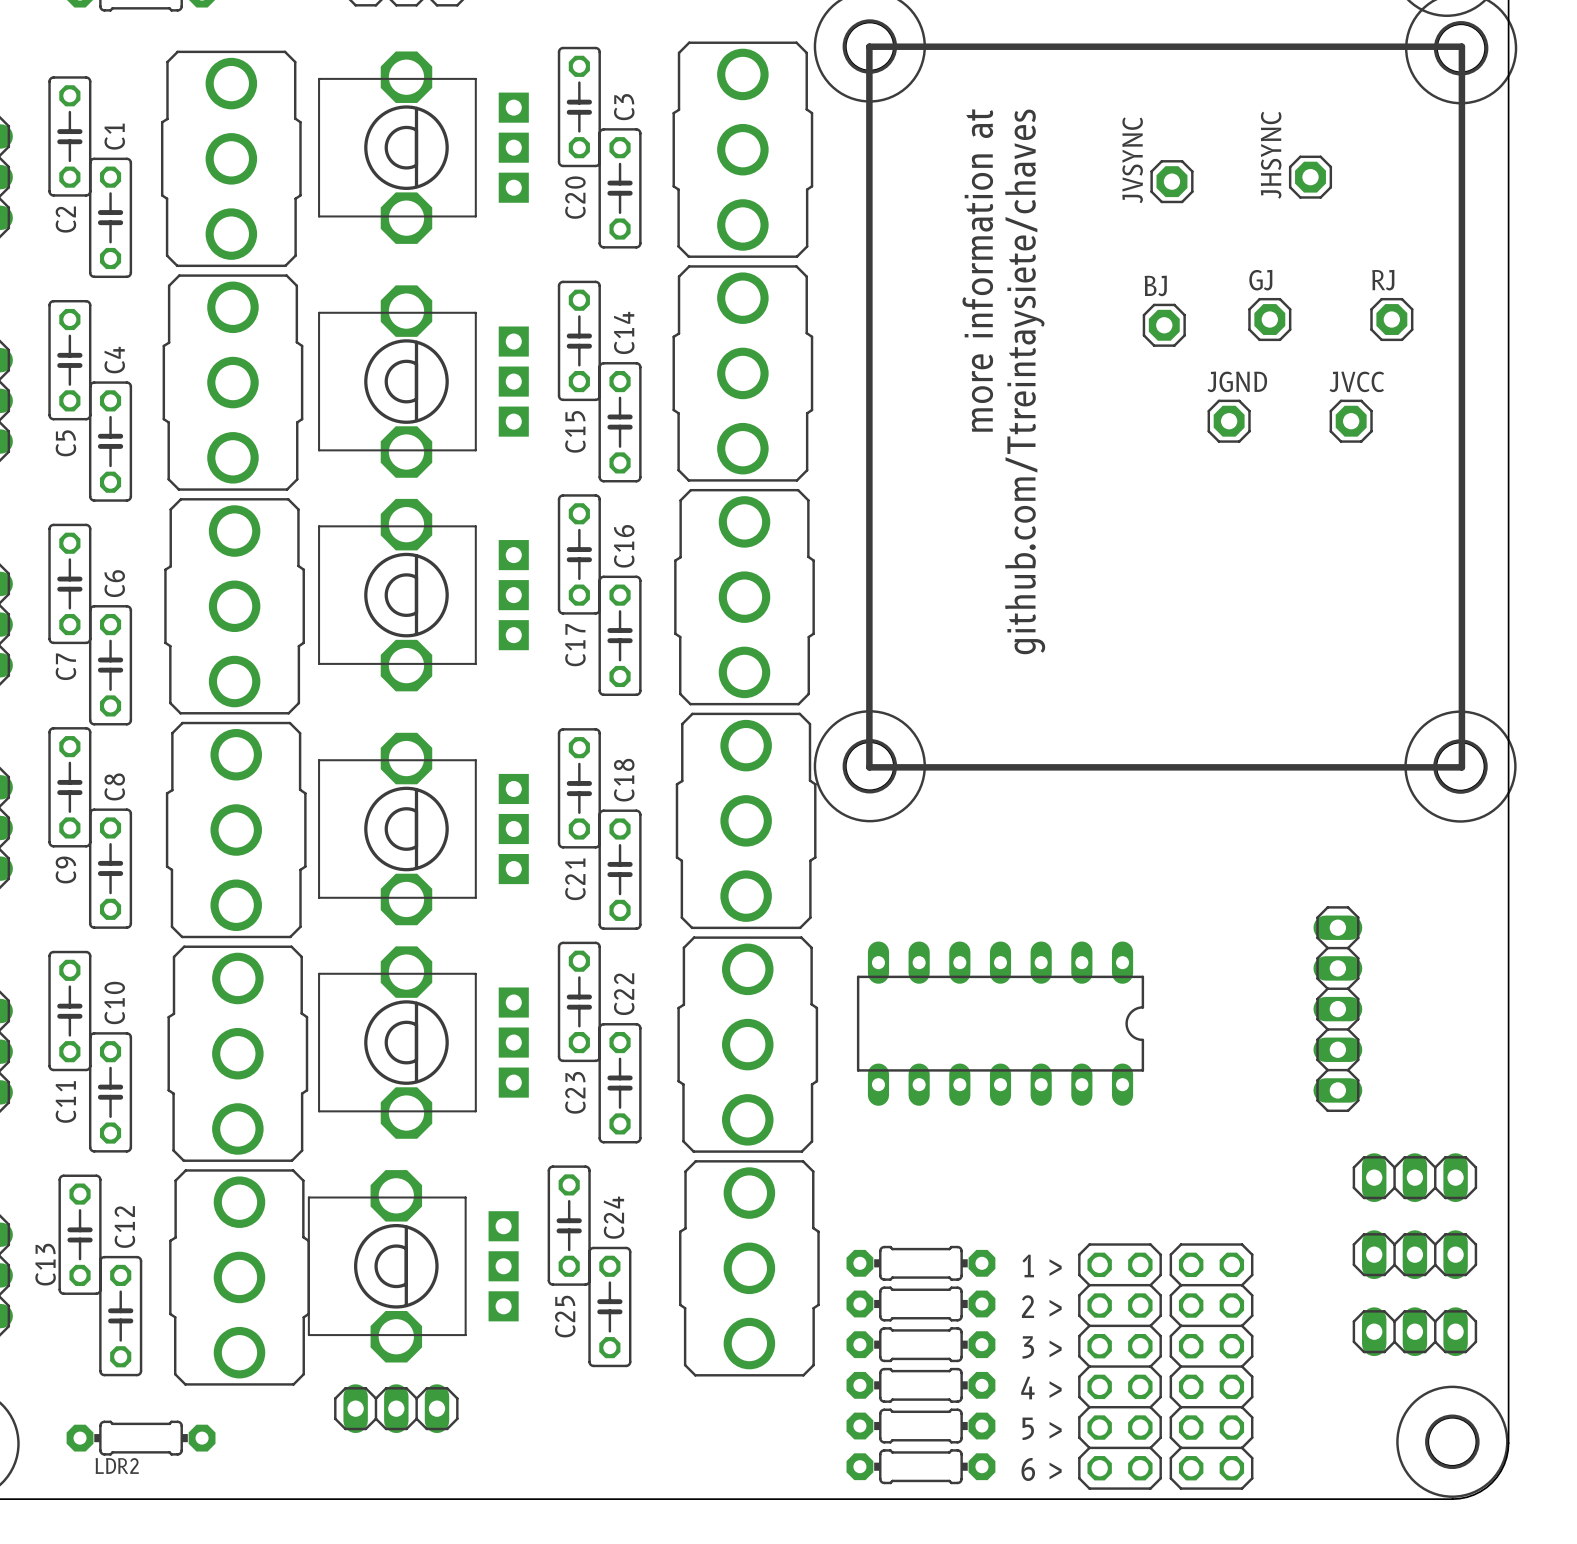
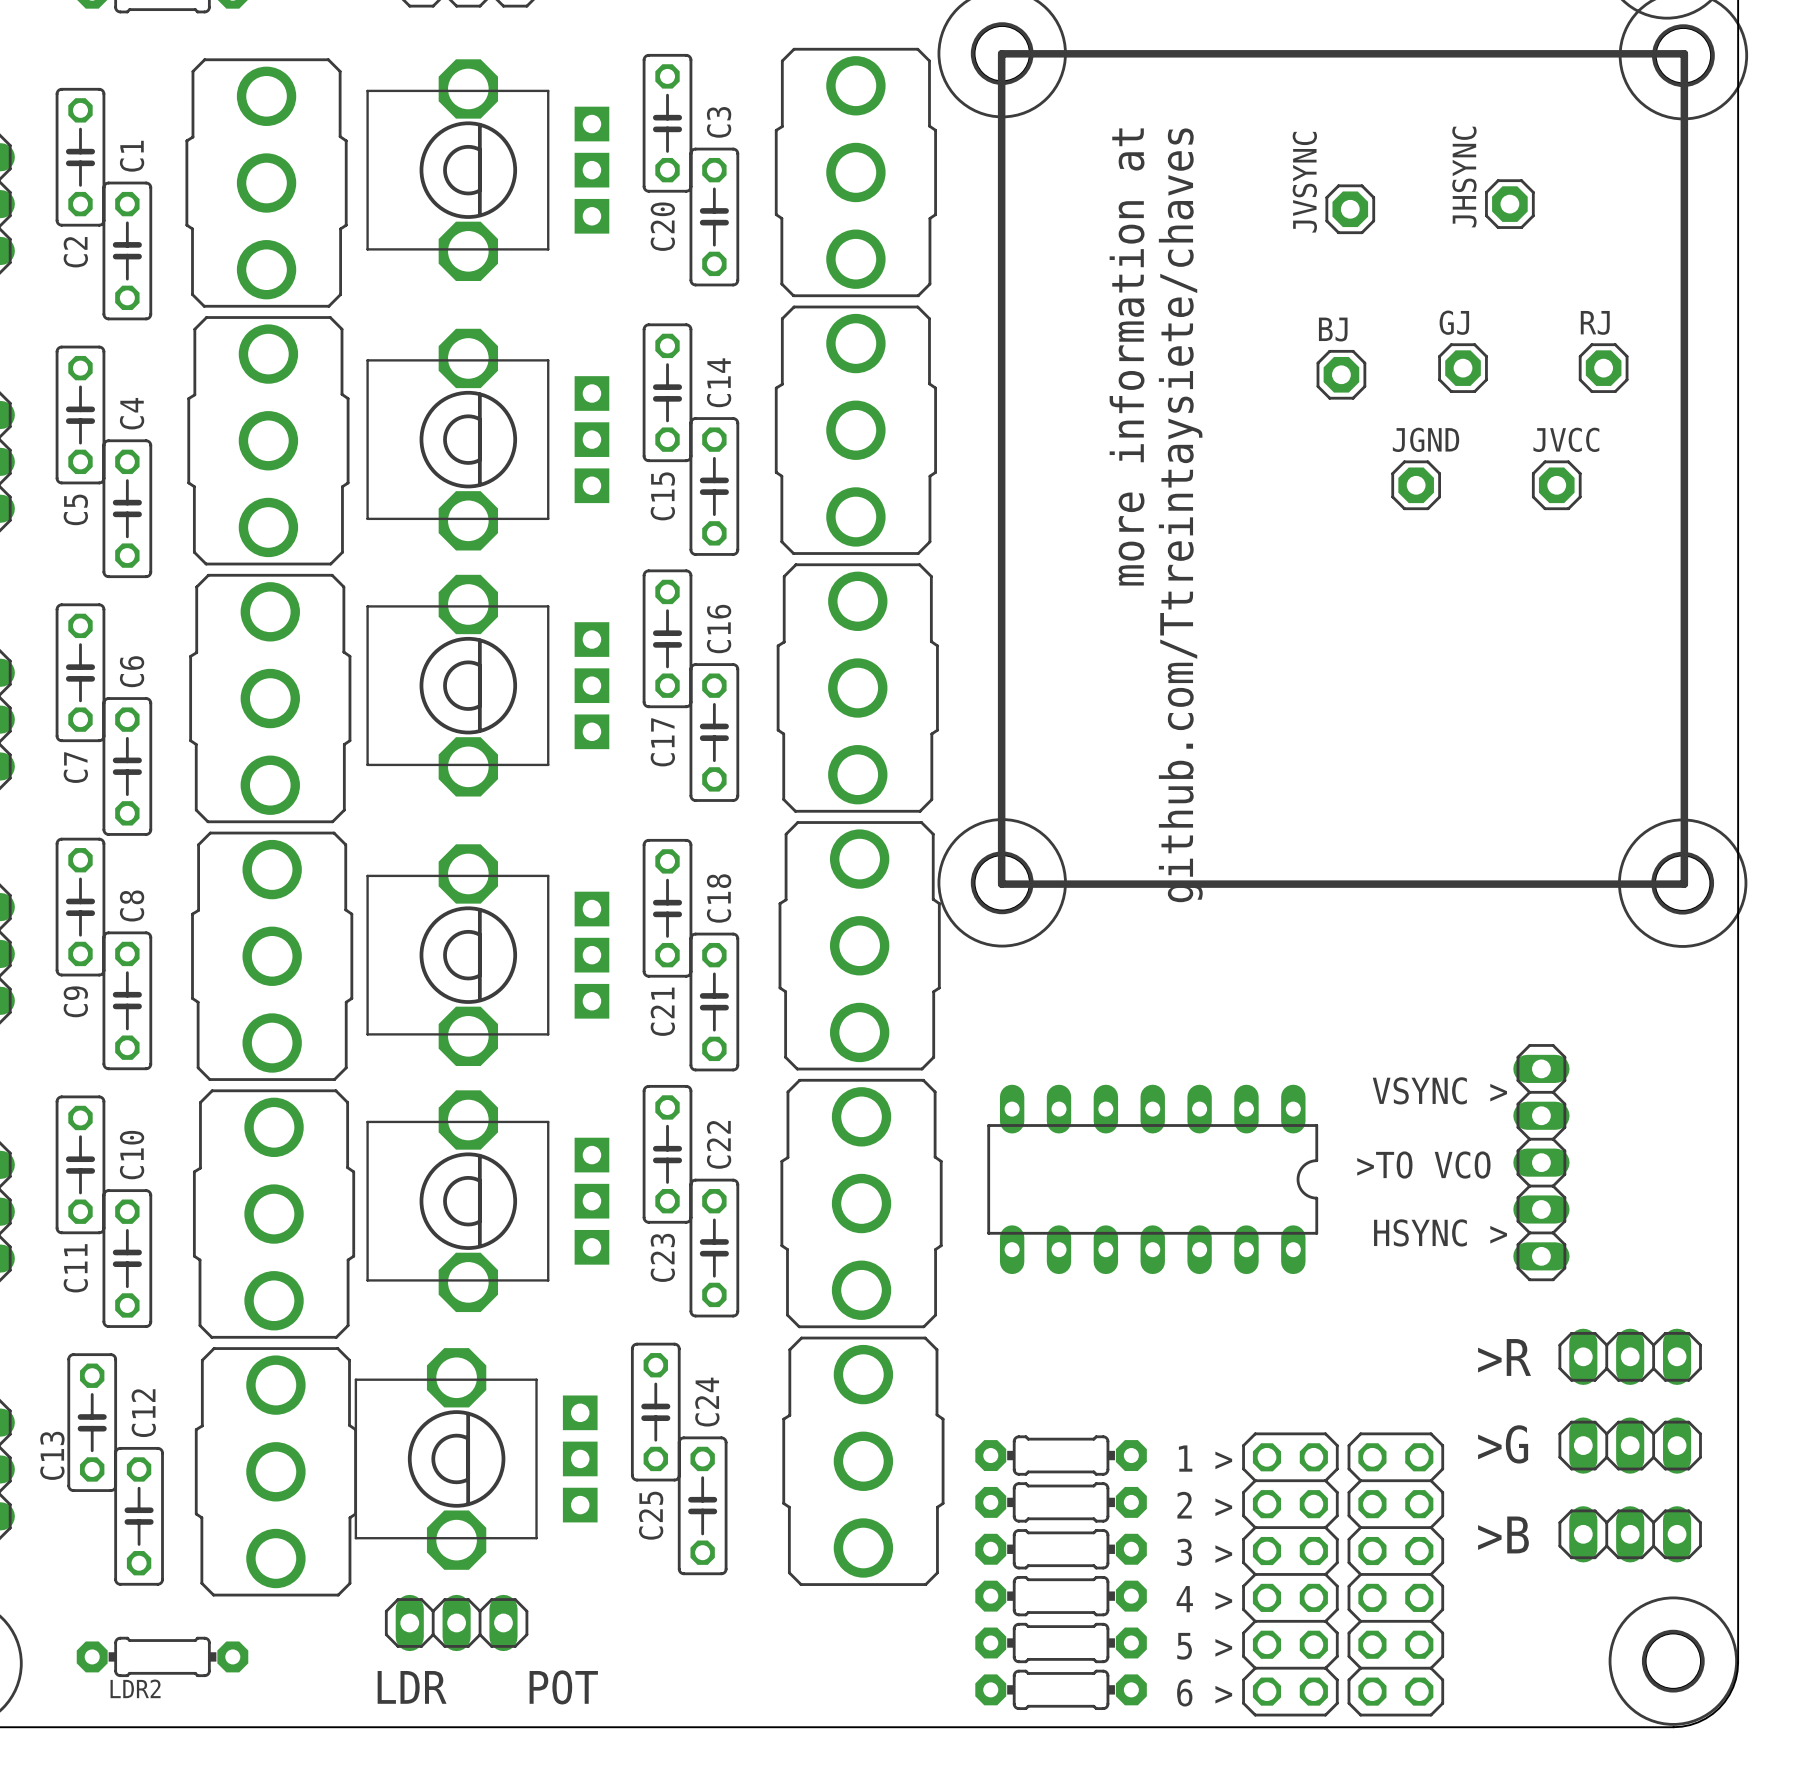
text: none -> VSYNC > (1439, 1090)
text: none -> >TO VCO (1423, 1165)
text: none -> HSYNC > (1440, 1232)
part value: none -> >R (1504, 1357)
part value: none -> >G (1503, 1444)
part value: none -> >B (1503, 1534)
text: none -> LDR (412, 1687)
text: none -> POT (563, 1687)

